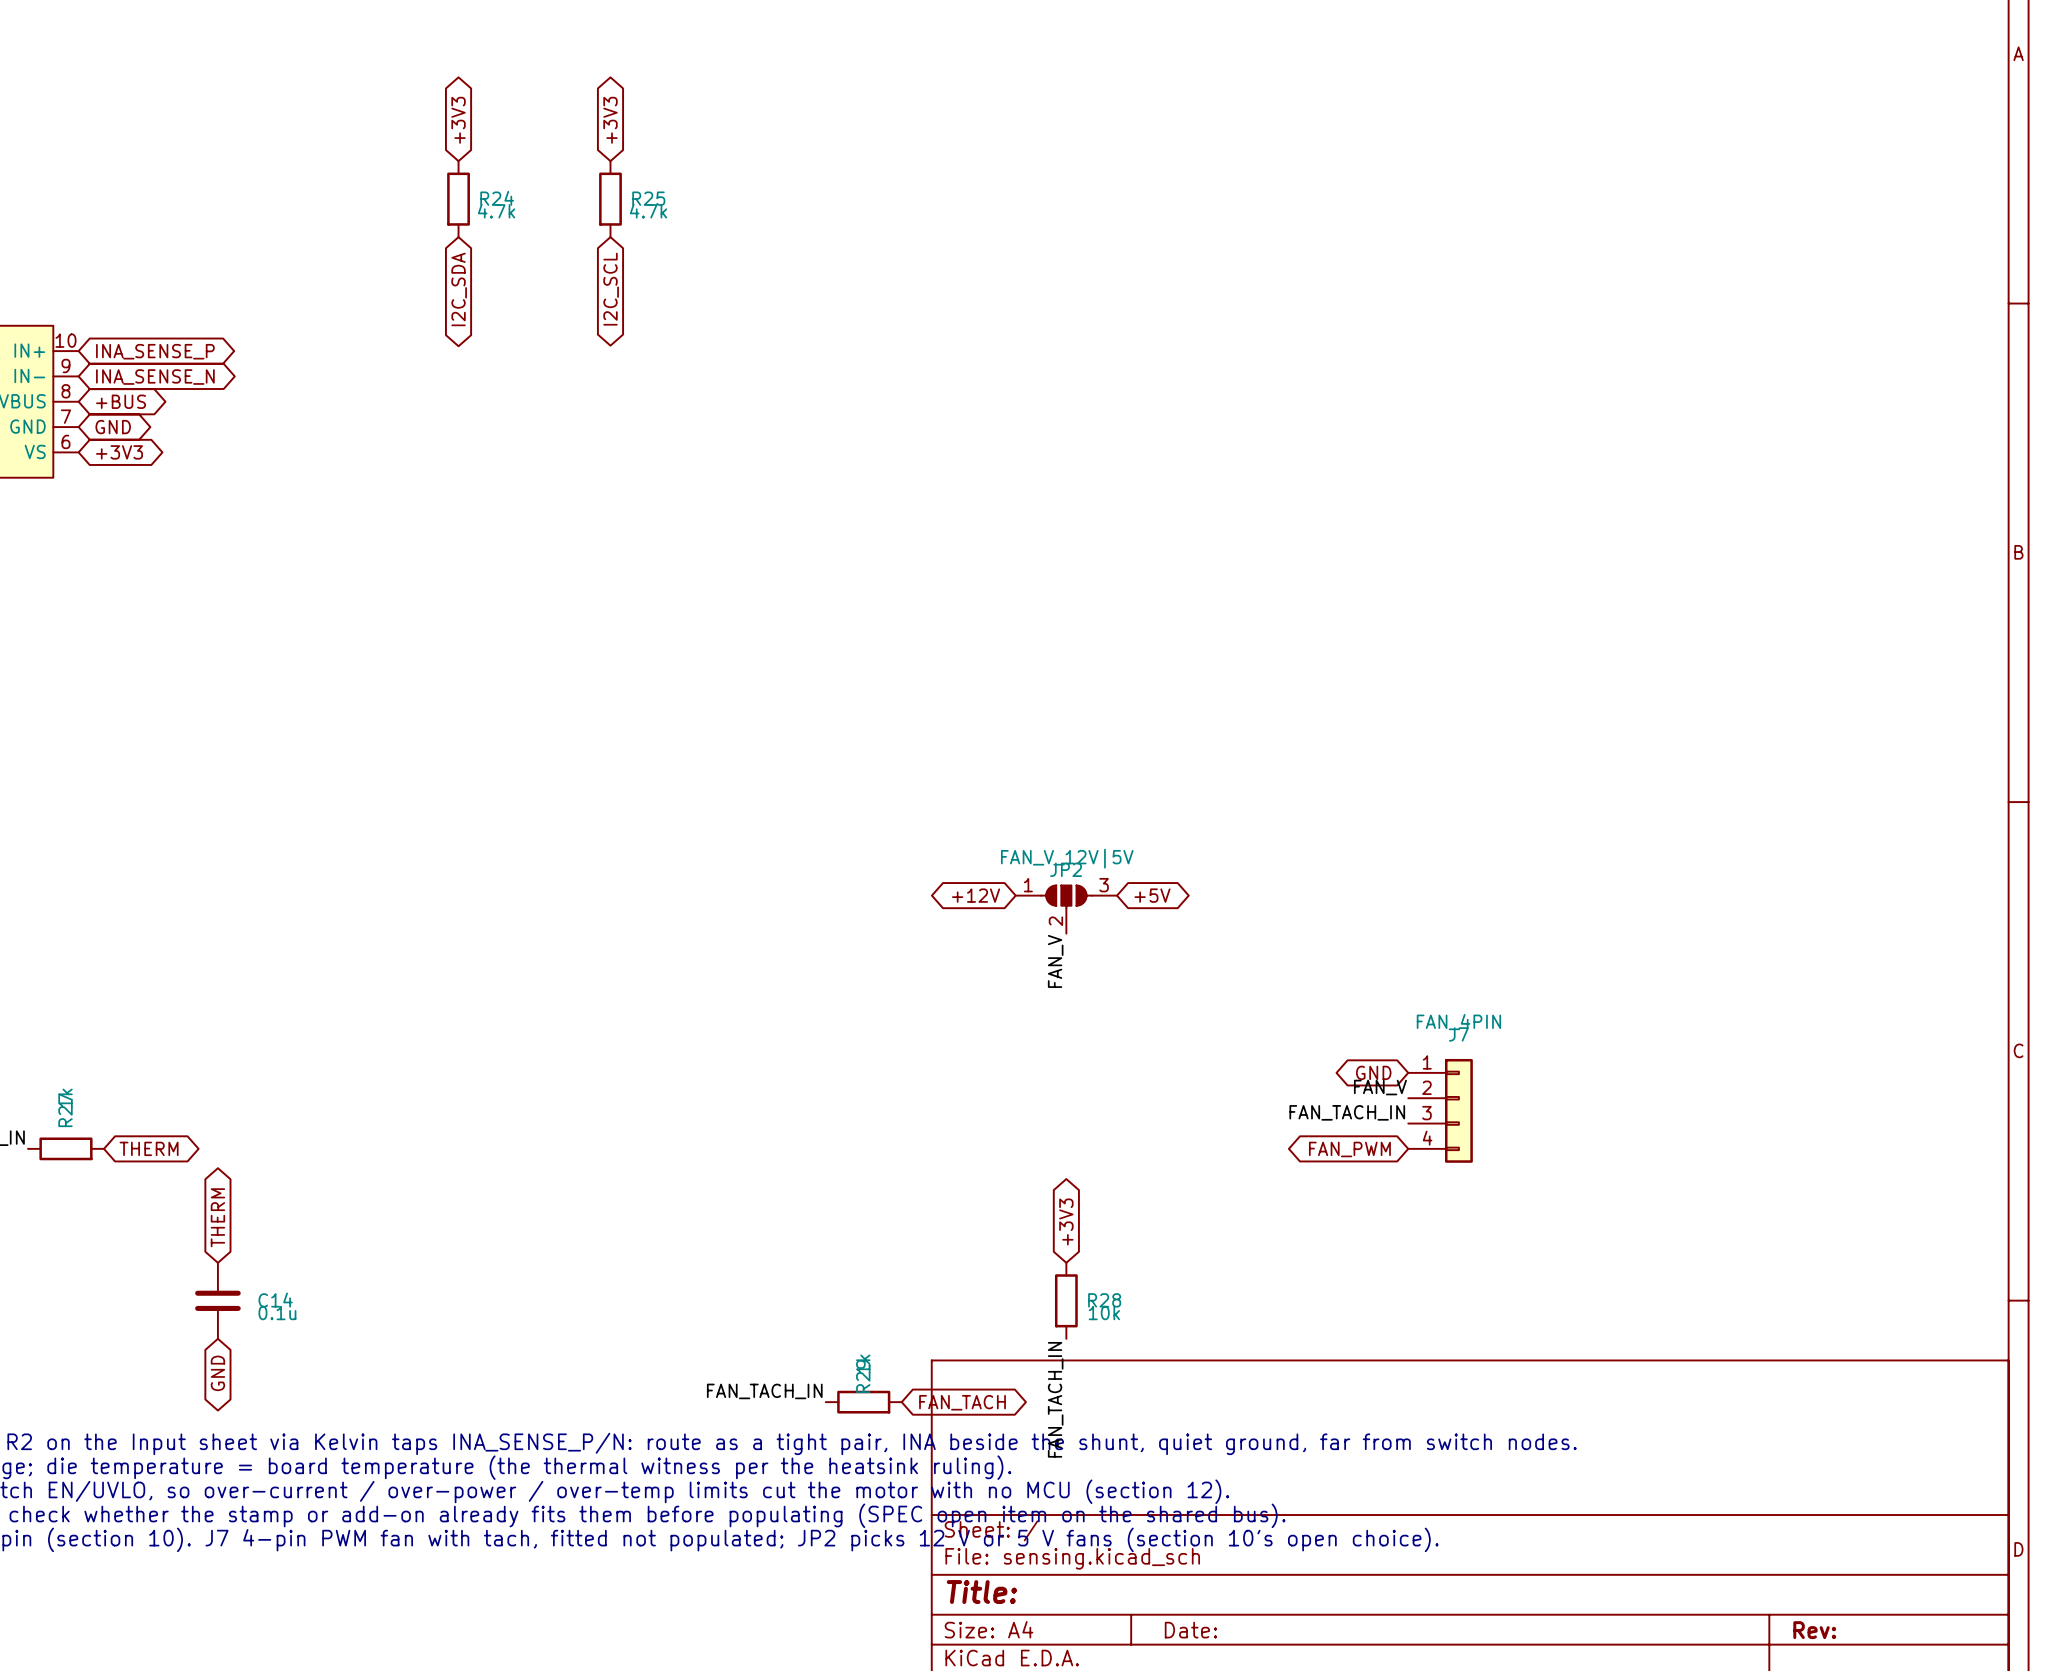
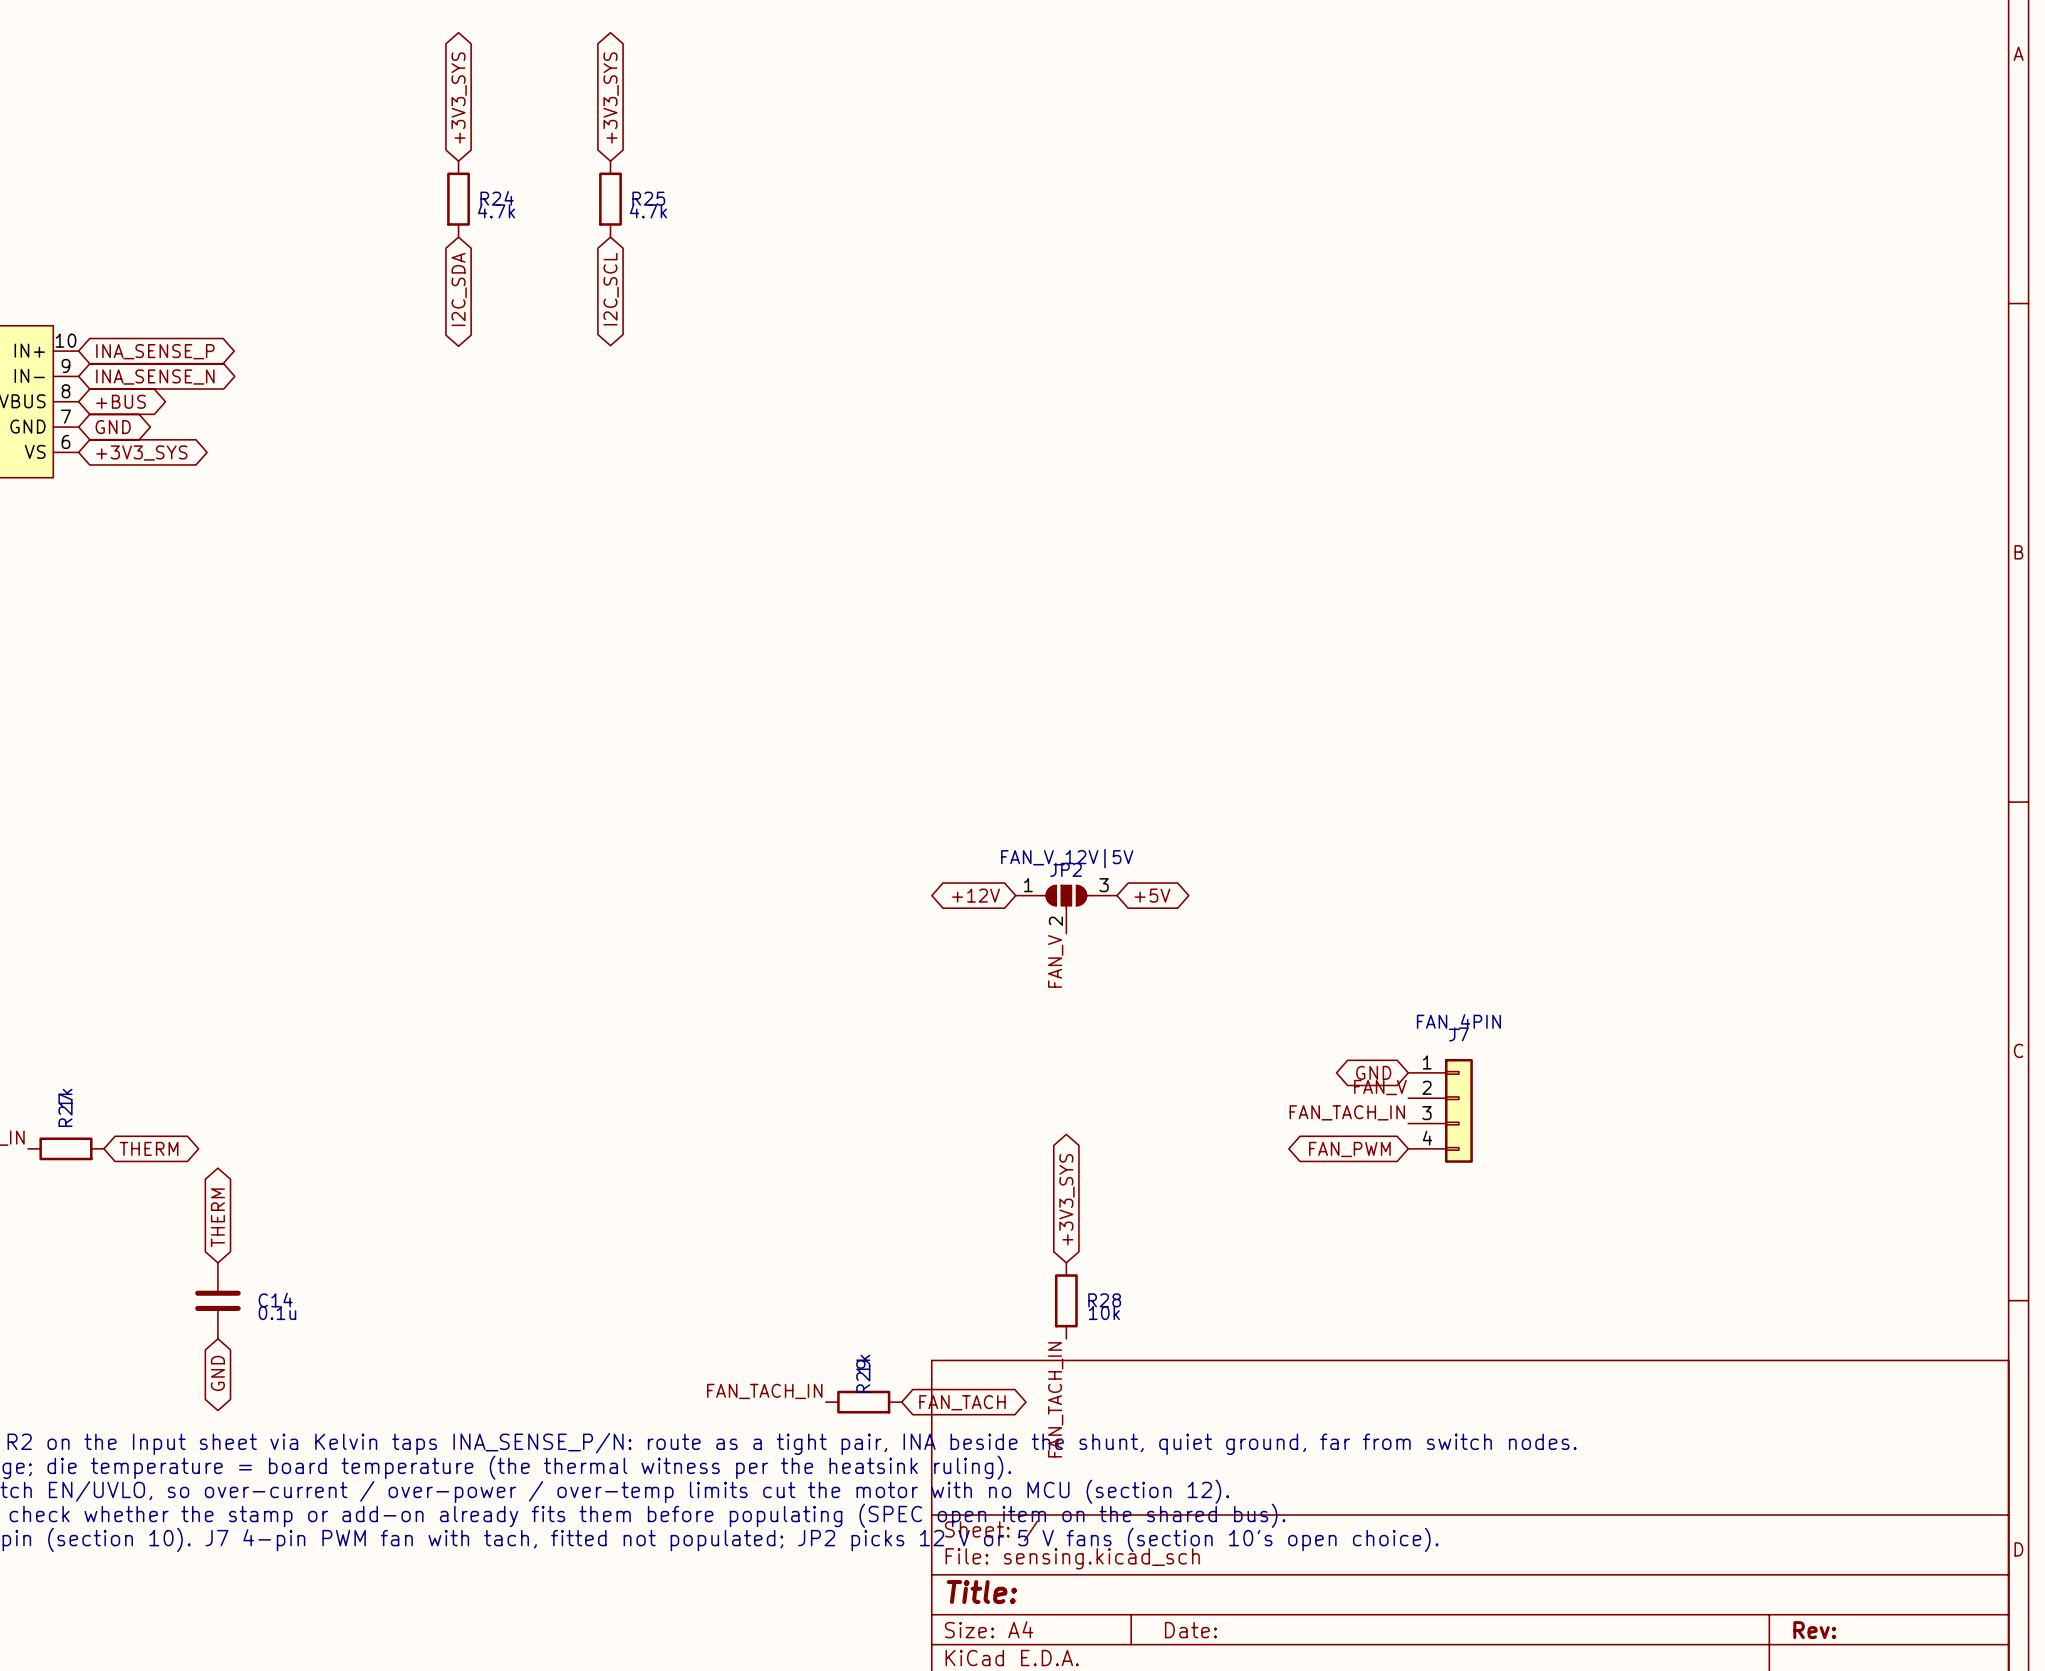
global label: +3V3 (458, 120) -> +3V3_SYS (459, 97)
global label: +3V3 (610, 120) -> +3V3_SYS (611, 97)
global label: +3V3 (119, 452) -> +3V3_SYS (141, 453)
global label: +3V3 (1066, 1221) -> +3V3_SYS (1066, 1199)

